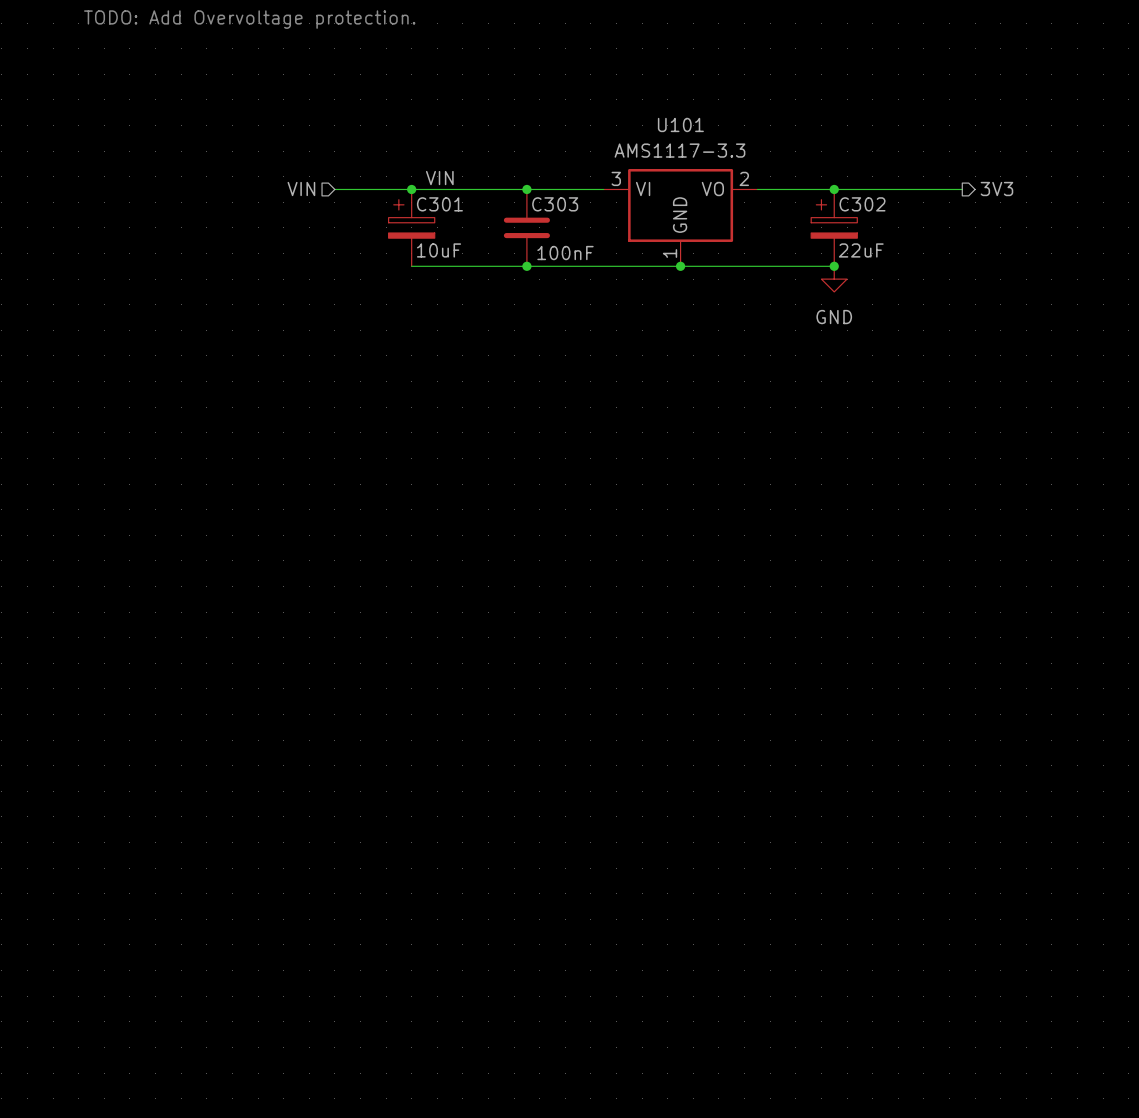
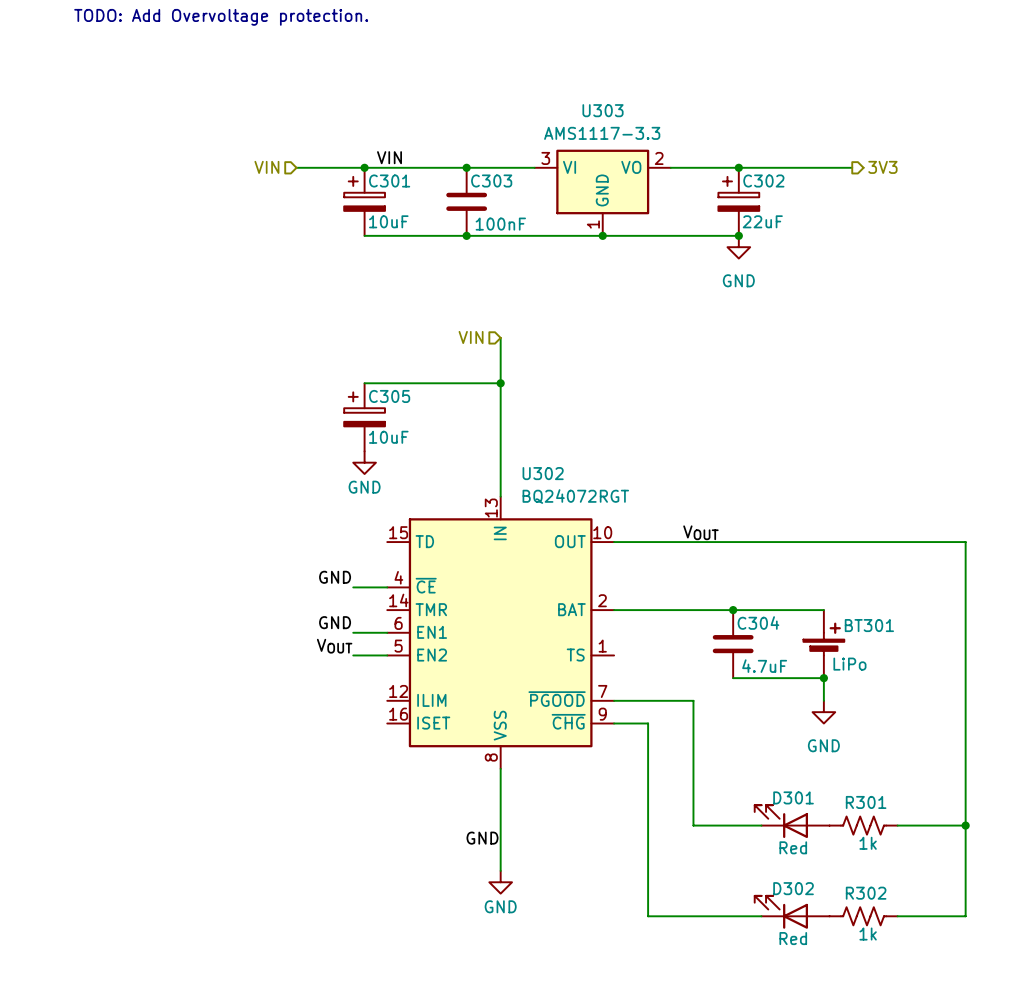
U101 name: U101 (680, 124) -> U303 (603, 110)
hierarchical label: none -> VIN (471, 337)
wire: none -> (500, 337) (500, 496)
wire: none -> (364, 383) (500, 383)
junction: none -> (500, 383)
C305: none -> 10uF (364, 417)
power symbol: none -> GND (364, 462)
label: none -> VOUT (700, 532)
wire: none -> (614, 542) (965, 542) (965, 916) (897, 916)
label: none -> GND (335, 577)
wire: none -> (353, 587) (387, 587)
wire: none -> (614, 610) (823, 610)
junction: none -> (733, 610)
label: none -> GND (335, 622)
wire: none -> (353, 632) (387, 632)
U302: none -> BQ24072RGT (500, 632)
C304: none -> 4.7uF (733, 644)
BT301: none -> LiPo (823, 644)
label: none -> VOUT (334, 646)
wire: none -> (353, 655) (387, 655)
wire: none -> (733, 678) (823, 678) (823, 700)
junction: none -> (823, 678)
wire: none -> (614, 700) (693, 700) (693, 825) (761, 825)
power symbol: none -> GND (823, 712)
wire: none -> (614, 723) (648, 723) (648, 916) (761, 916)
wire: none -> (500, 768) (500, 870)
D301: none -> Red (792, 821)
R301: none -> 1k (863, 825)
wire: none -> (897, 825) (965, 825)
junction: none -> (965, 825)
label: none -> GND (482, 838)
power symbol: none -> GND (500, 882)
D302: none -> Red (792, 912)
R302: none -> 1k (863, 916)

